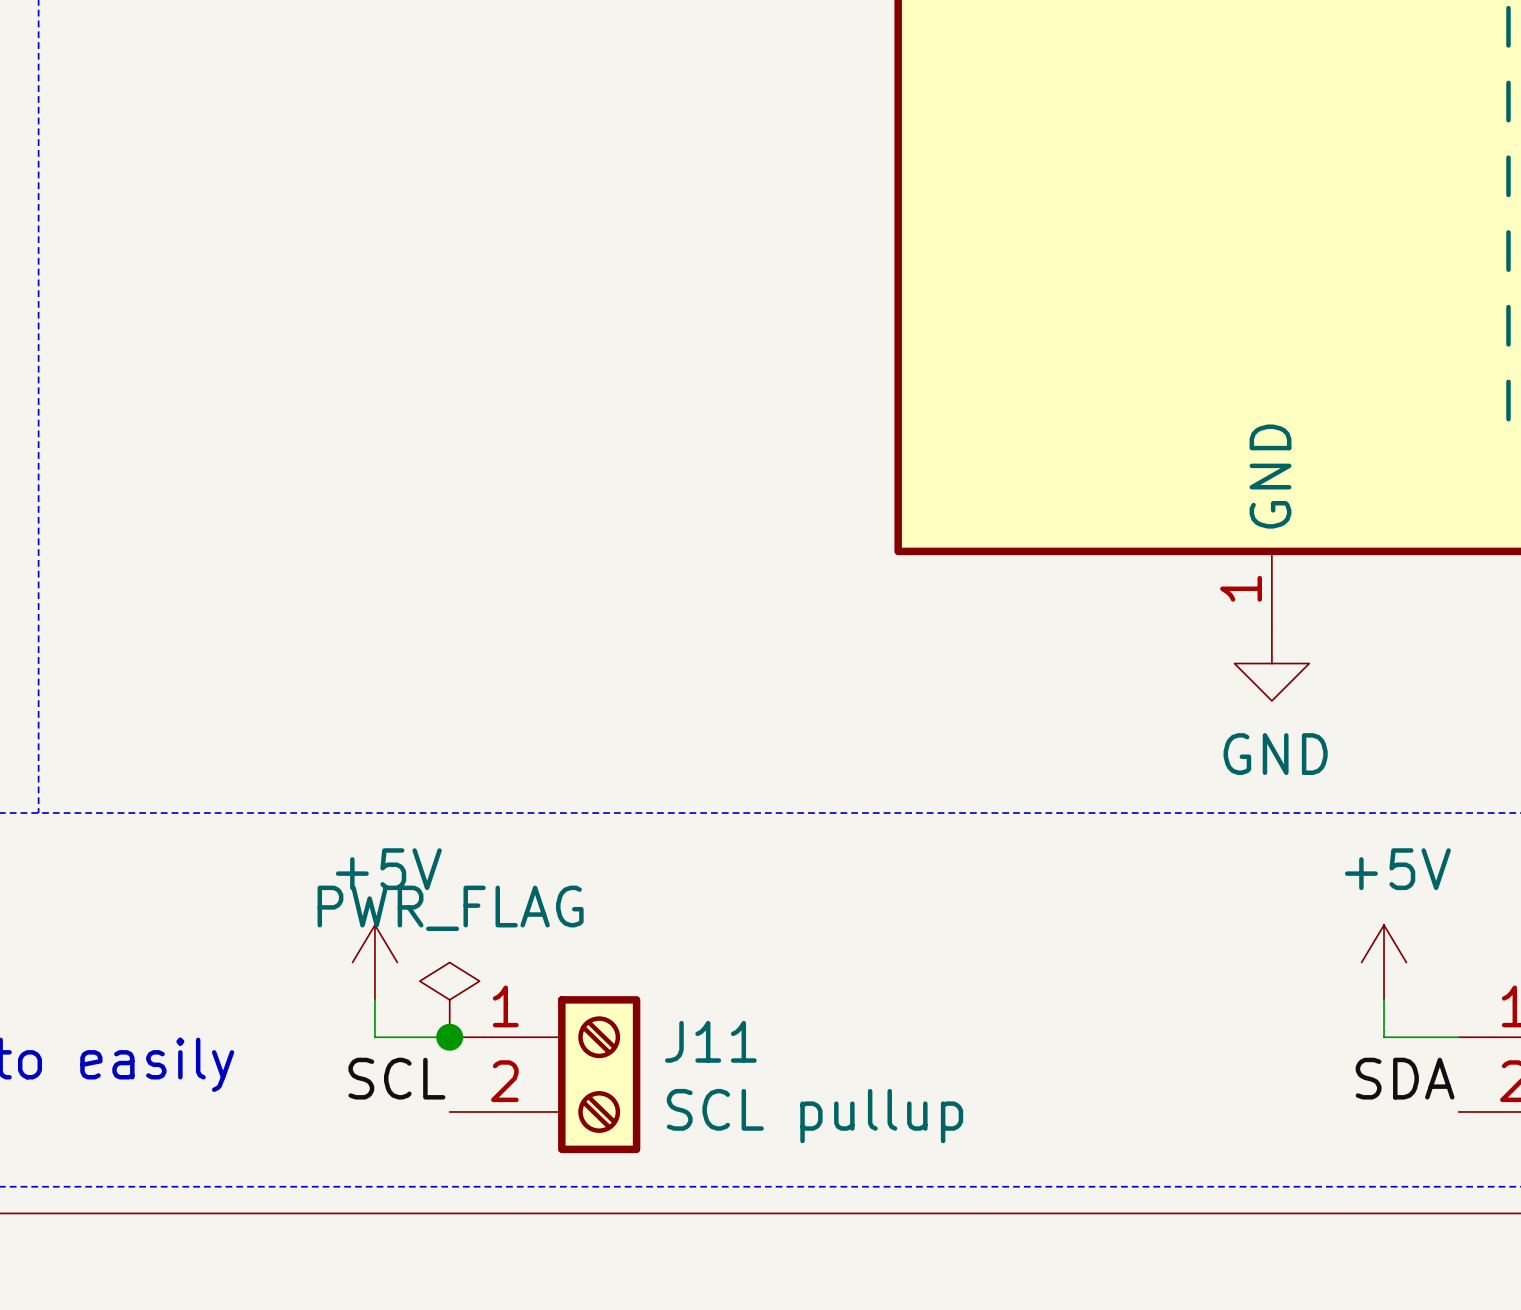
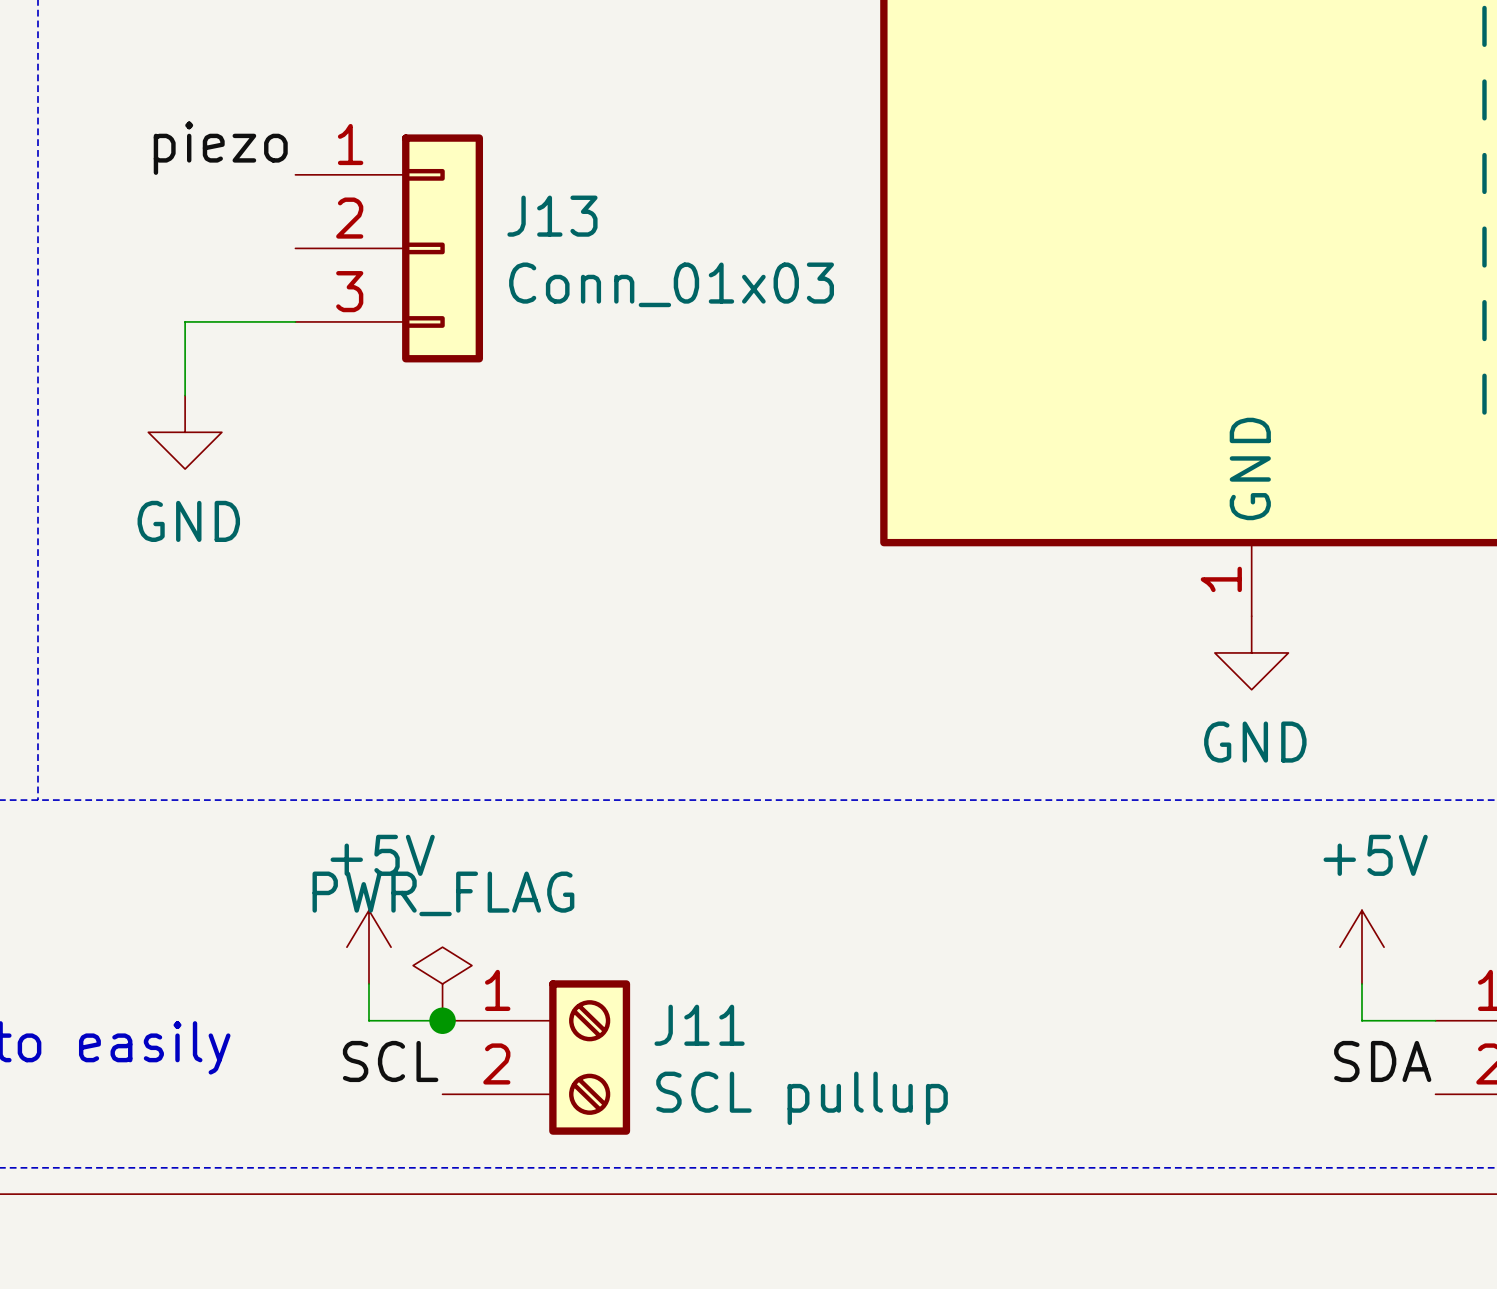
label: none -> piezo (220, 148)
J13: none -> Conn_01x03 (389, 248)
wire: none -> (295, 321) (185, 321) (185, 395)
power symbol: none -> GND (185, 432)

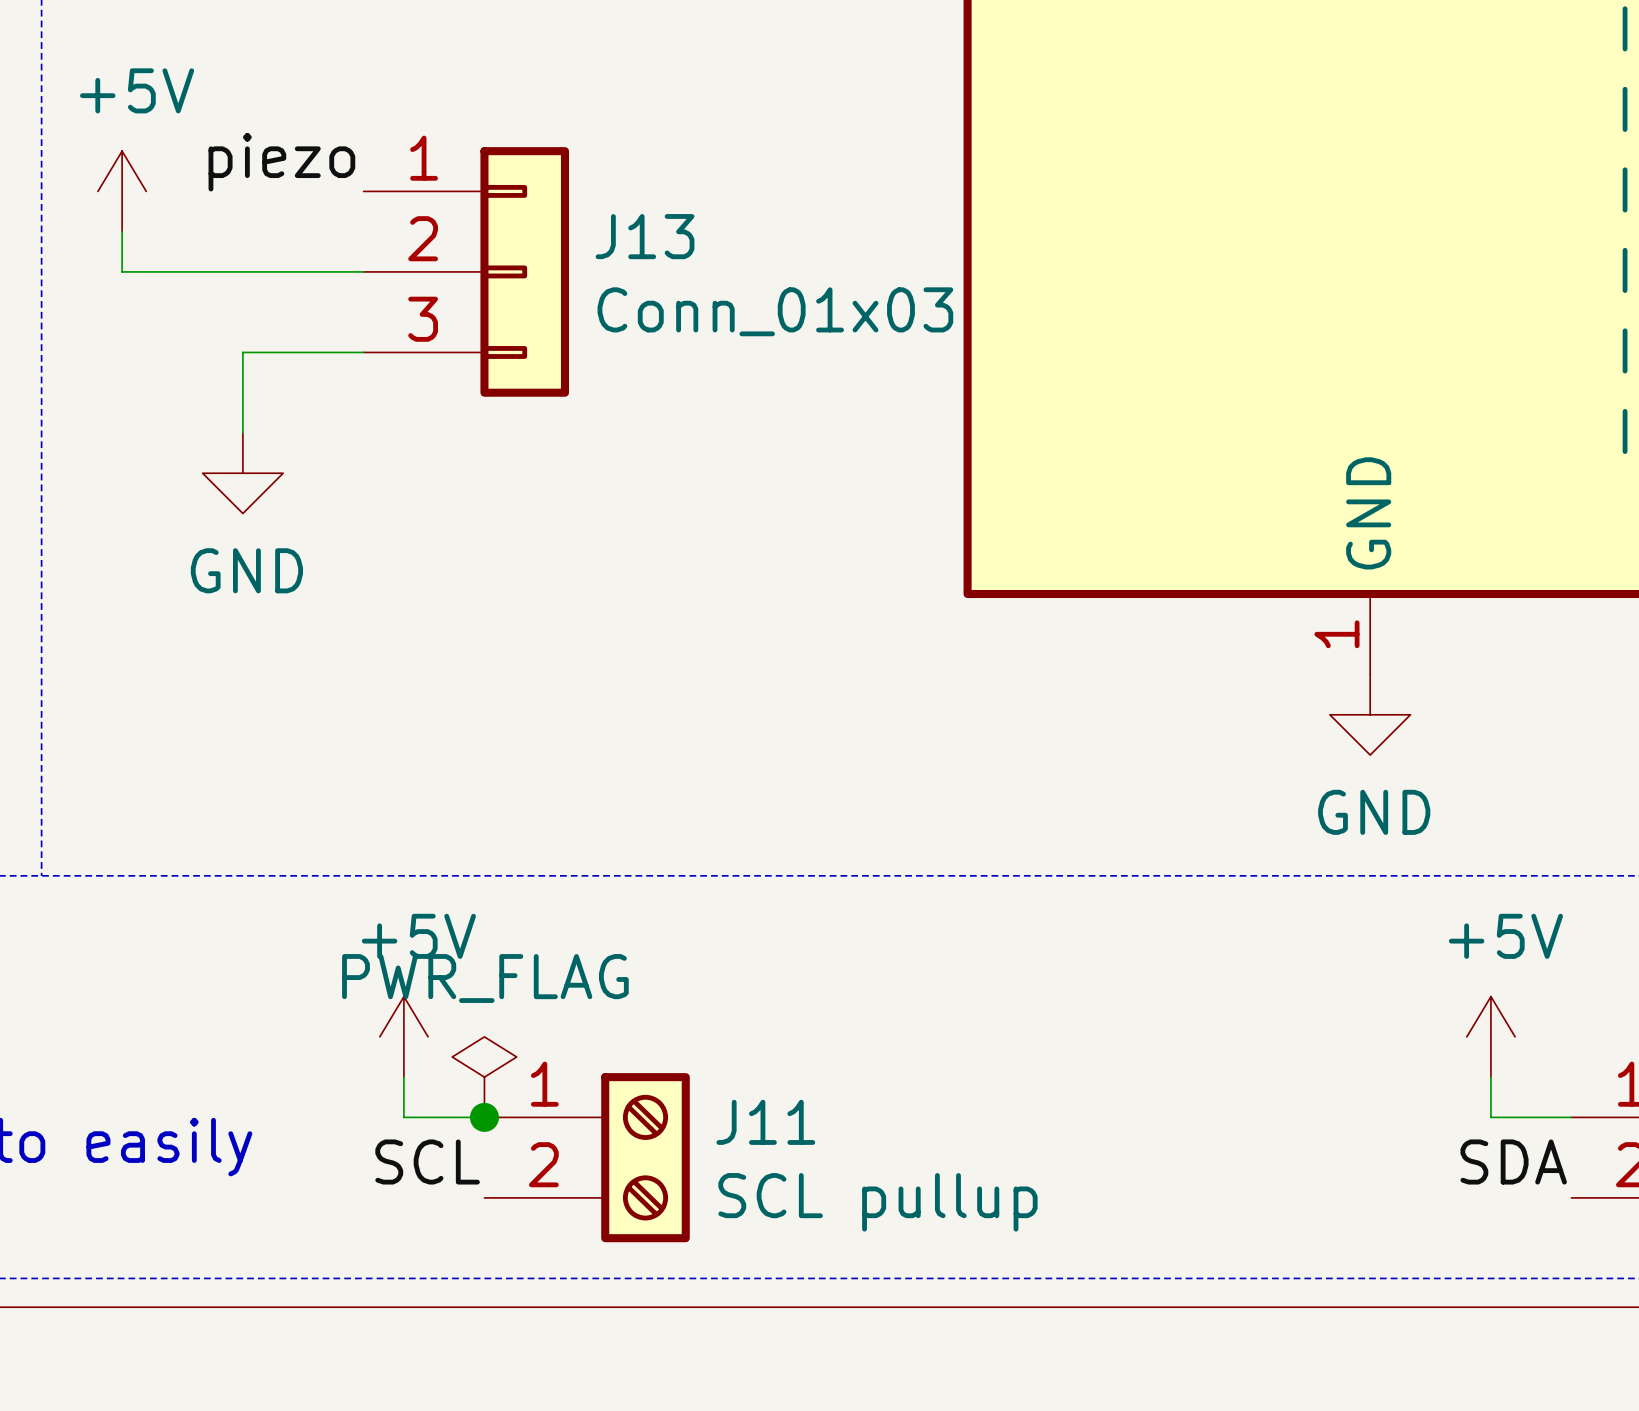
label position: piezo (220, 148) -> piezo (281, 162)
power symbol: none -> +5V (122, 191)
wire: none -> (122, 231) (122, 271) (363, 271)
J13 position: (389, 248) -> (466, 271)
wire: (221, 321) (185, 321) (185, 395) -> (242, 352) (242, 432)
power symbol position: GND (185, 432) -> GND (242, 473)

